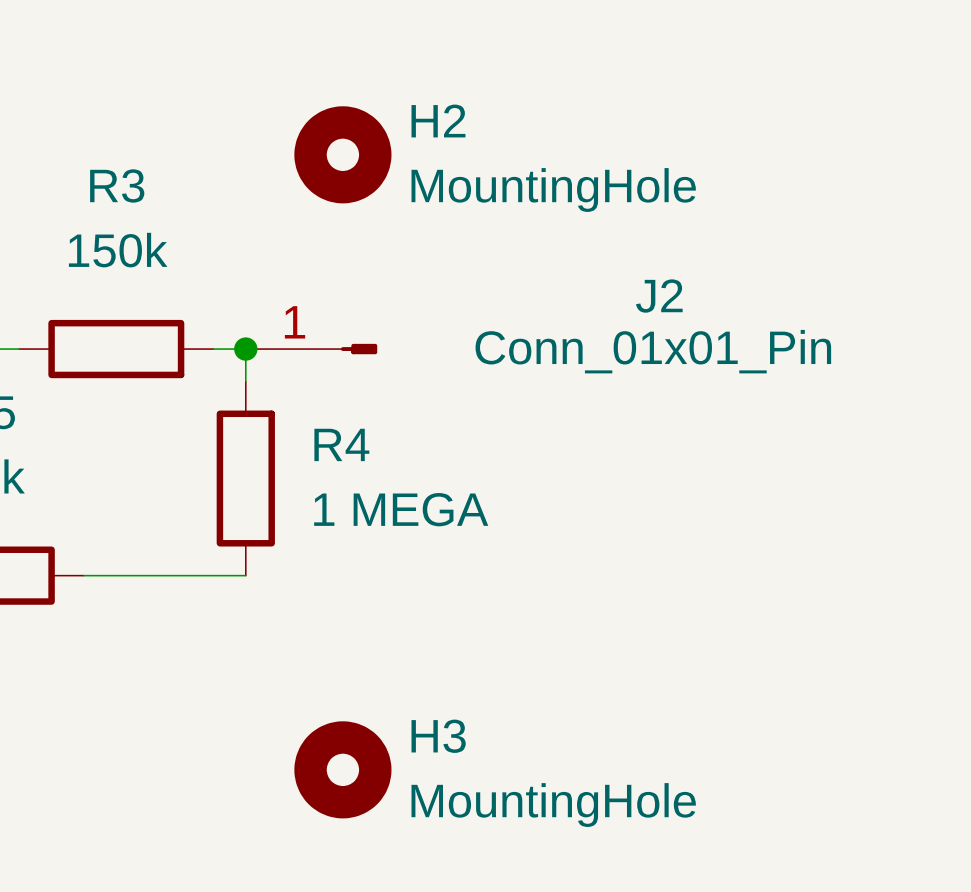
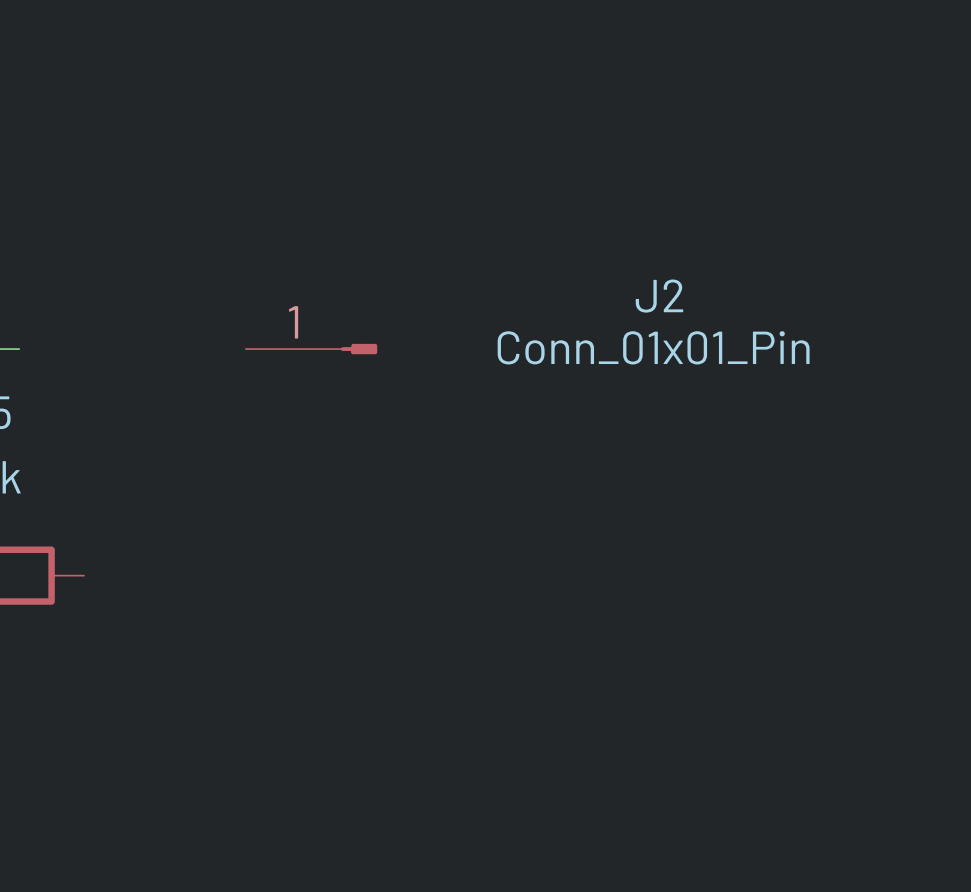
H2: MountingHole (342, 154) -> none
R3: 150k (116, 349) -> none
wire: (213, 349) (245, 349) (245, 381) -> none
junction: (245, 349) -> none
R4: 1 MEGA (245, 478) -> none
wire: (83, 575) (245, 575) -> none
H3: MountingHole (342, 769) -> none

